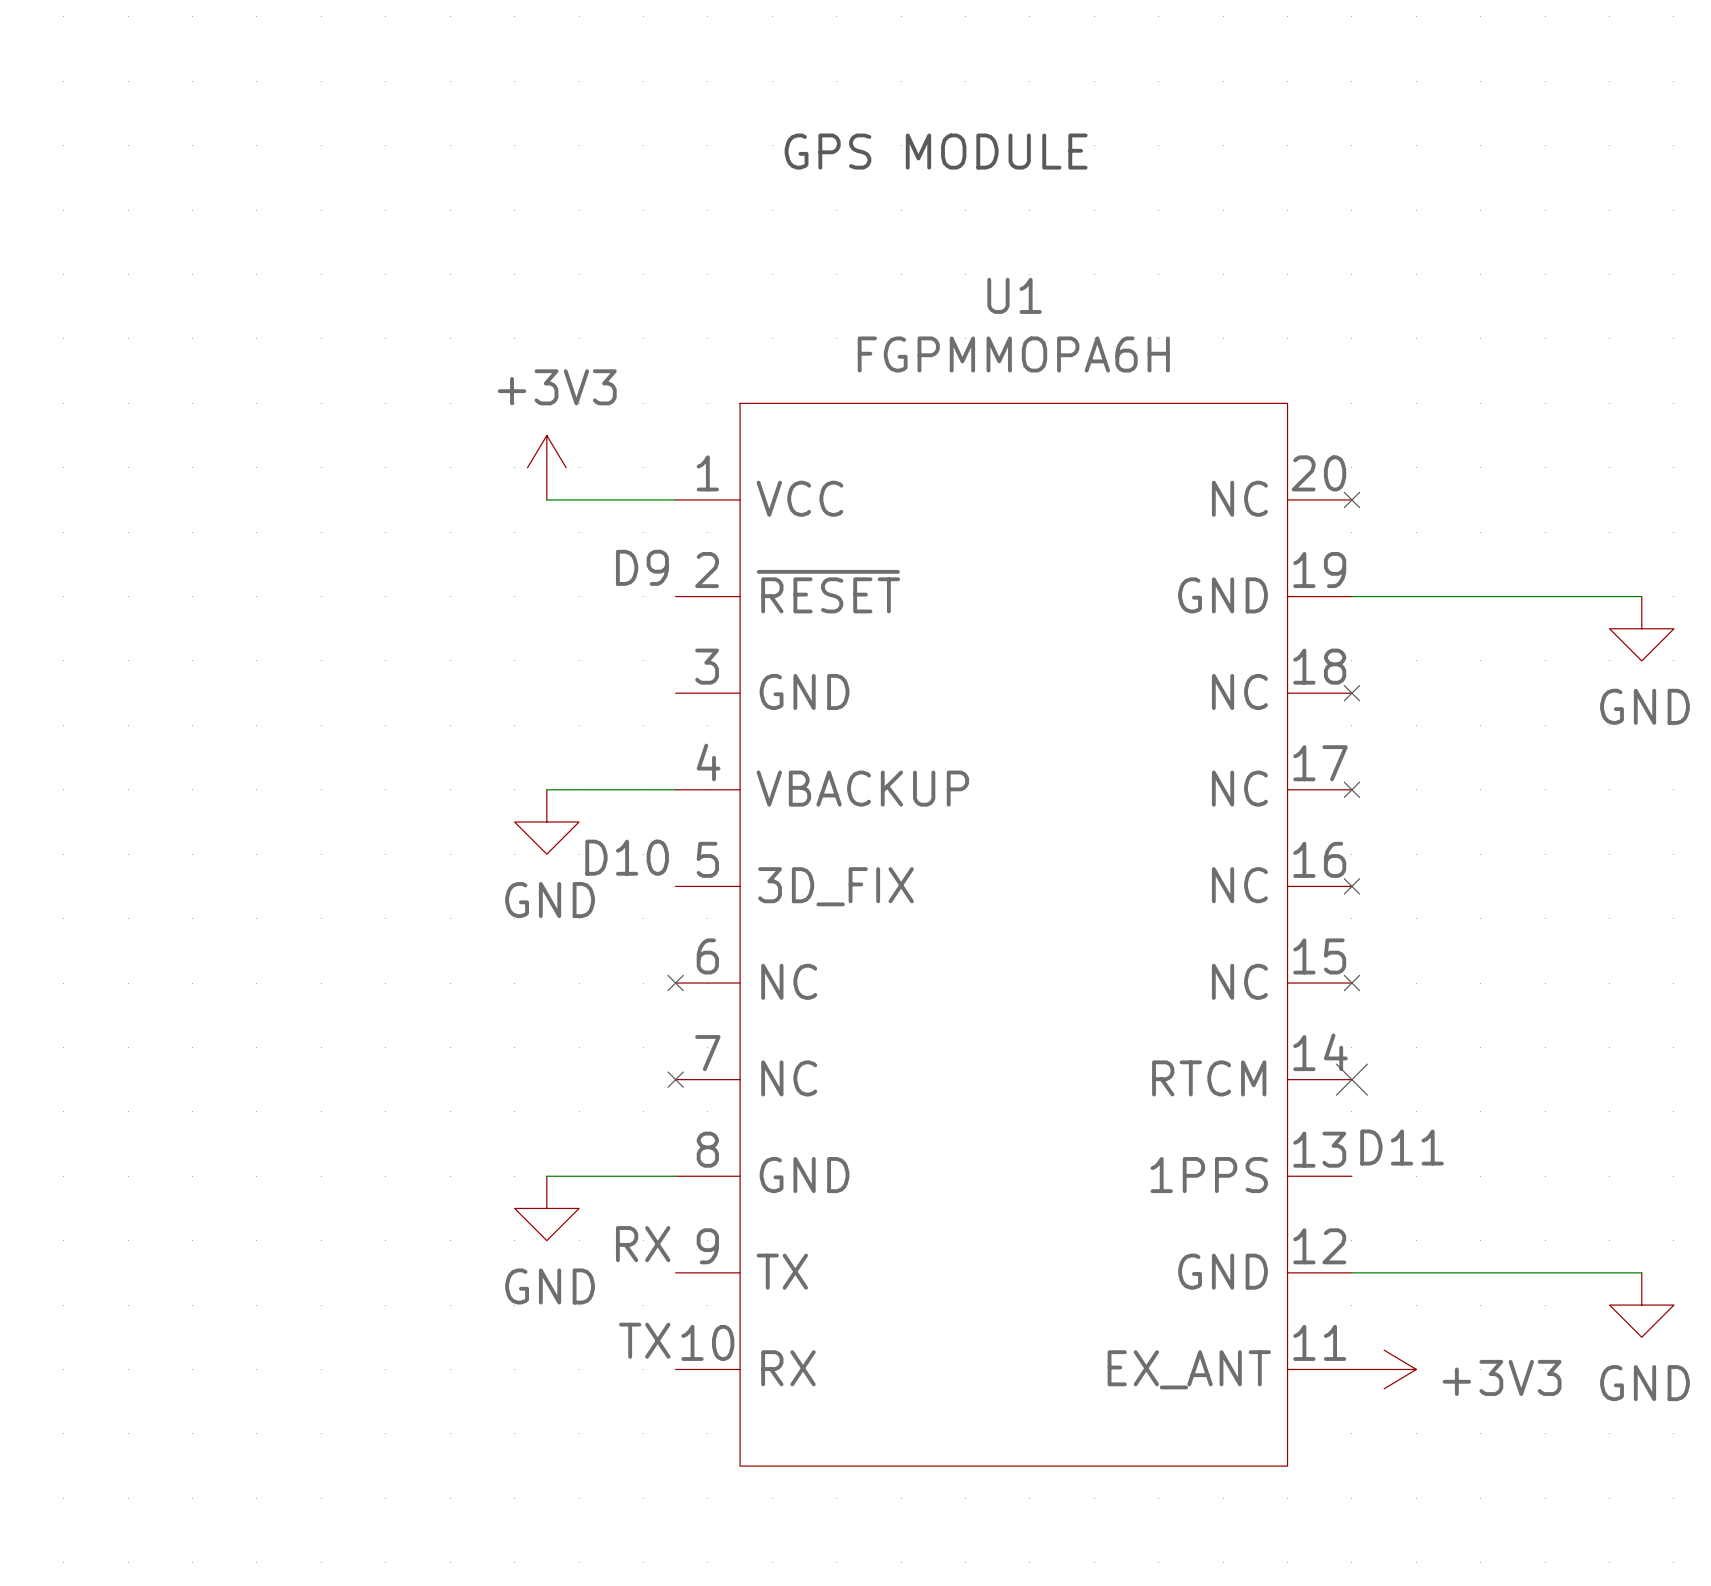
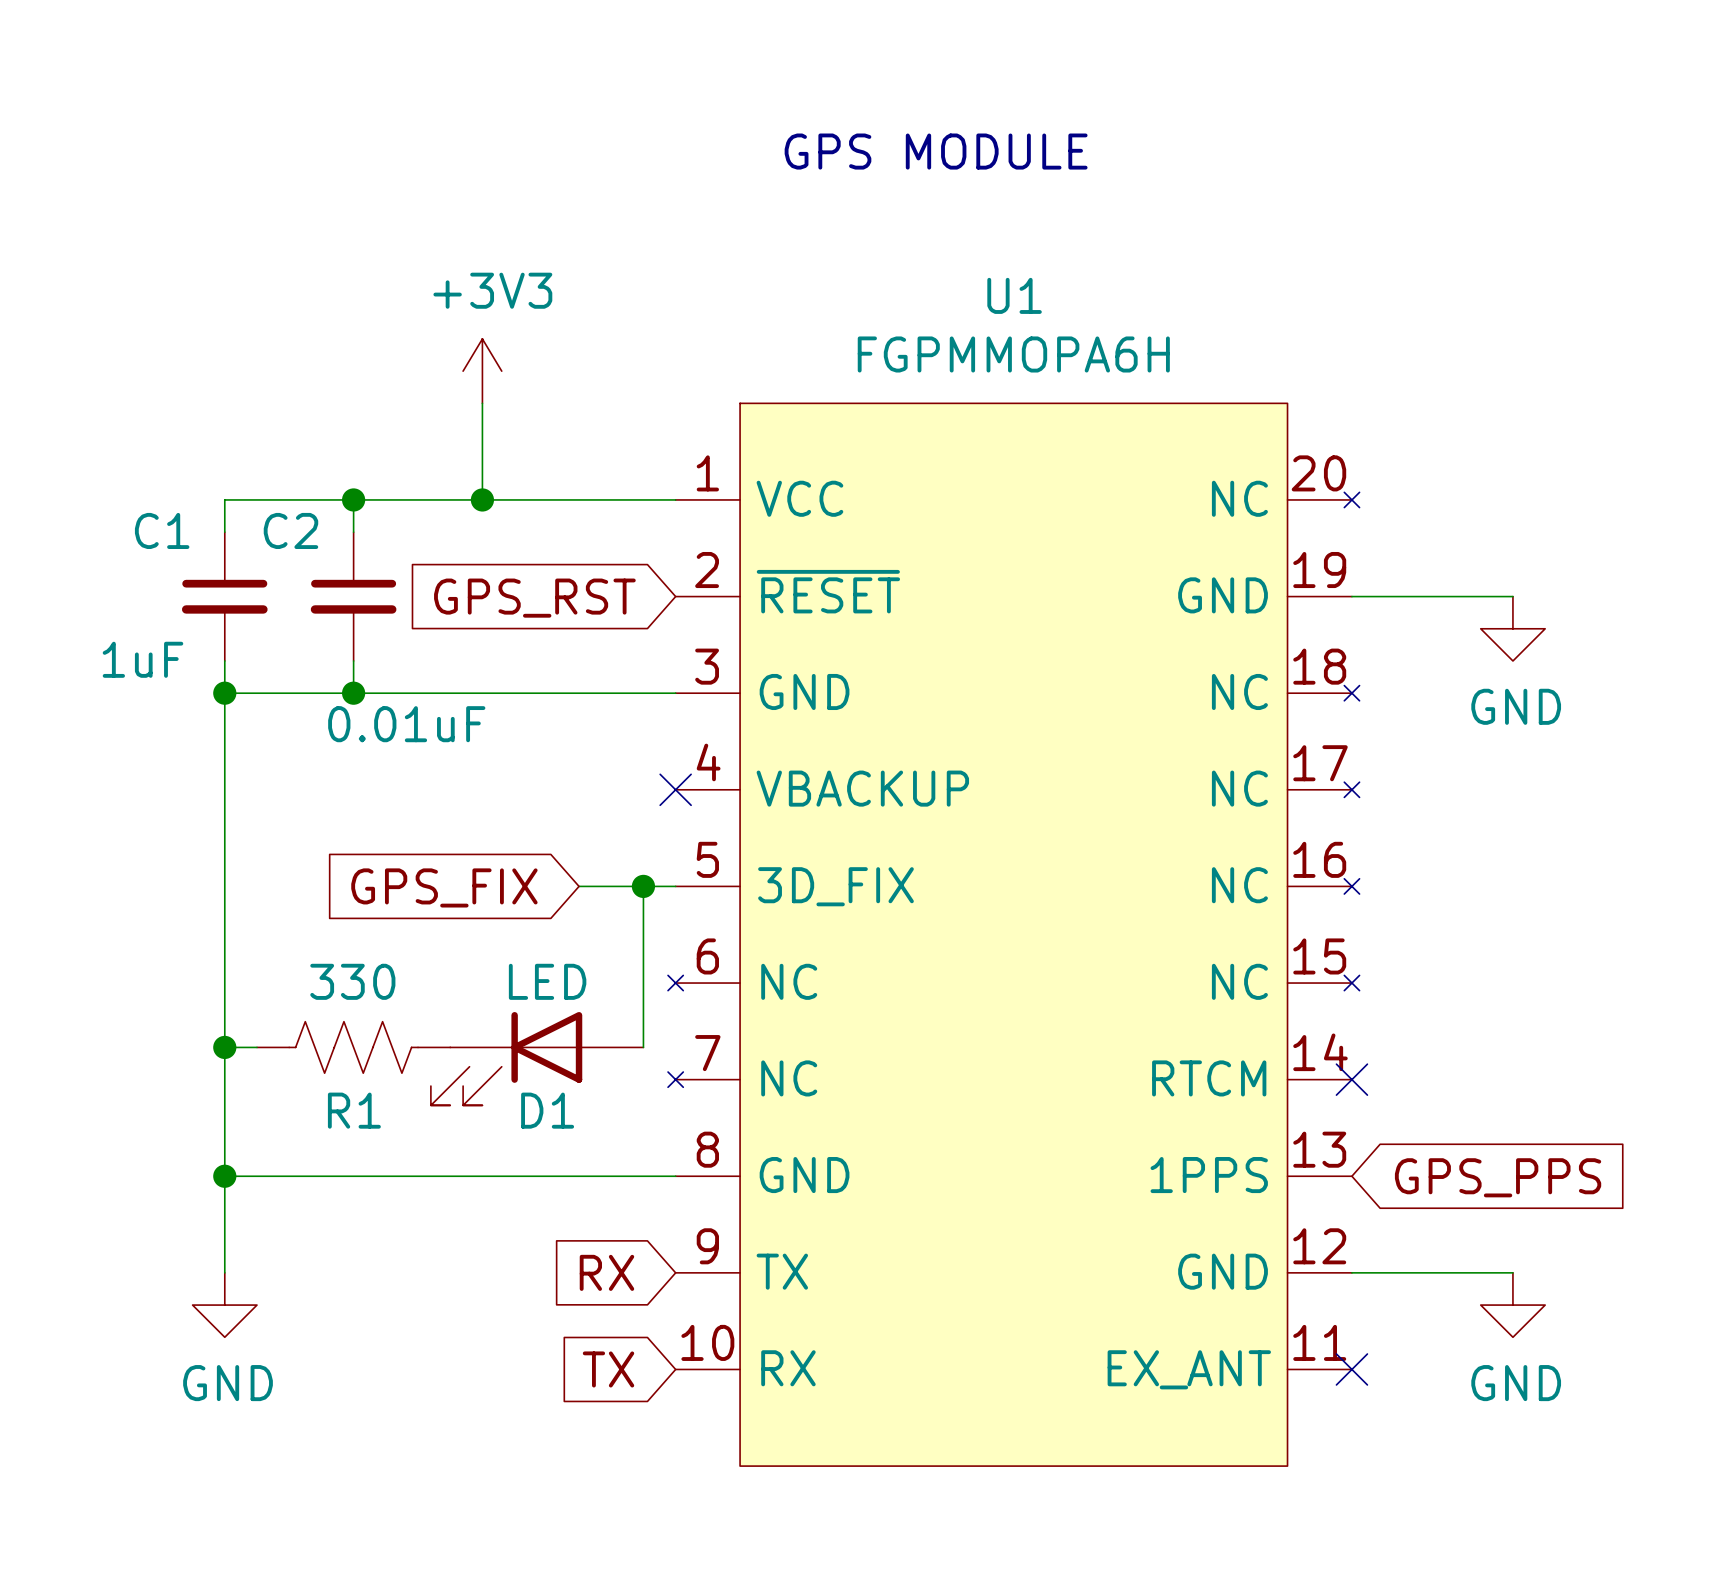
wire: none -> (482, 403) (482, 499)
power symbol position: +3V3 (546, 467) -> +3V3 (482, 371)
wire: none -> (353, 499) (353, 532)
junction: none -> (353, 499)
junction: none -> (482, 499)
wire: none -> (546, 499) (224, 499) (224, 532)
label: D9 (642, 567) -> none
C1: none -> 1uF (224, 596)
C2: none -> 0.01uF (353, 596)
wire: (1512, 596) (1641, 596) -> none
global label: none -> GPS_RST (534, 598)
power symbol position: GND (1641, 628) -> GND (1512, 628)
wire: none -> (224, 660) (224, 1272)
wire: none -> (353, 660) (353, 693)
wire: none -> (224, 693) (675, 693)
junction: none -> (224, 693)
junction: none -> (353, 693)
wire: (546, 789) (675, 789) -> none
no-connect mark: none -> (675, 789)
power symbol: GND (546, 822) -> none
label: D10 (627, 857) -> none
wire: none -> (579, 886) (675, 886)
wire: none -> (643, 886) (643, 1047)
junction: none -> (643, 886)
global label: none -> GPS_FIX (444, 887)
wire: none -> (224, 1047) (256, 1047)
junction: none -> (224, 1047)
R1: none -> 330 (353, 1047)
D1: none -> LED (537, 1058)
label: D11 (1402, 1147) -> none
wire: none -> (224, 1176) (546, 1176)
junction: none -> (224, 1176)
global label: none -> GPS_PPS (1498, 1177)
power symbol: GND (546, 1208) -> none
label: RX (643, 1244) -> none
global label: none -> RX (606, 1272)
wire: (1512, 1272) (1641, 1272) -> none
power symbol: none -> GND (224, 1305)
power symbol position: GND (1641, 1305) -> GND (1512, 1305)
label: TX (644, 1340) -> none
global label: none -> TX (608, 1369)
no-connect mark: none -> (1351, 1369)
power symbol: +3V3 (1384, 1369) -> none

